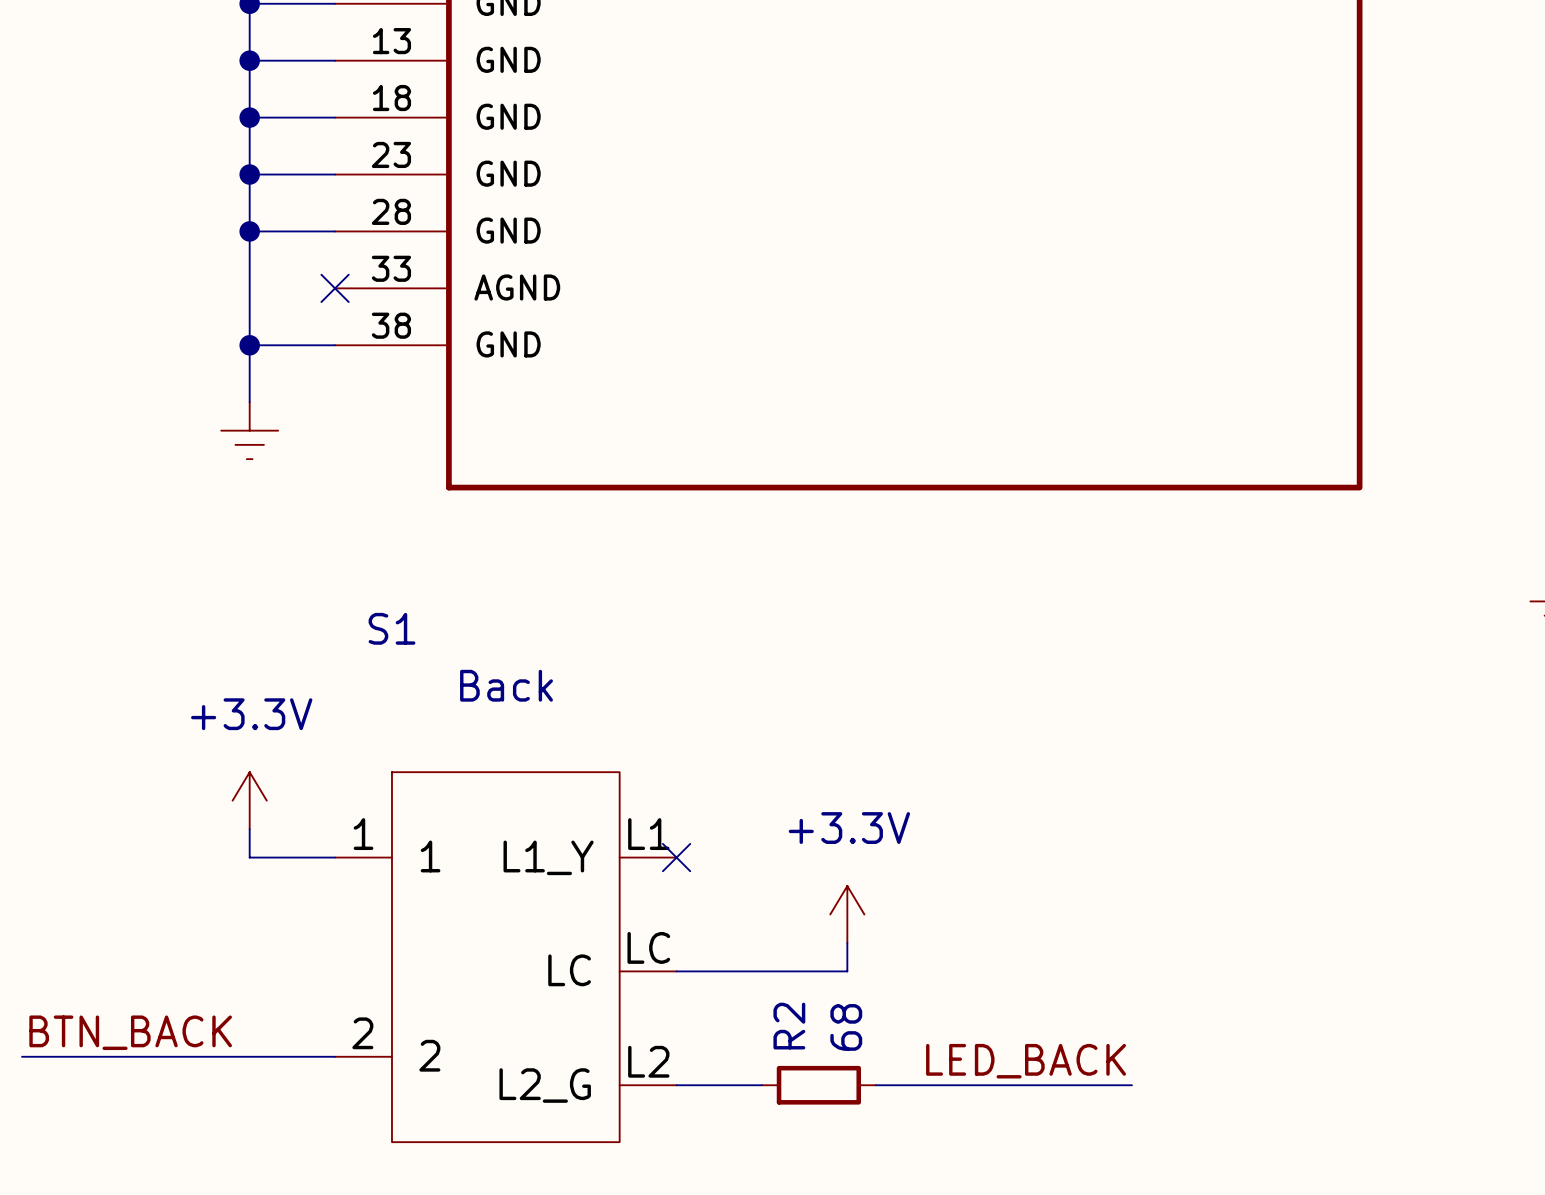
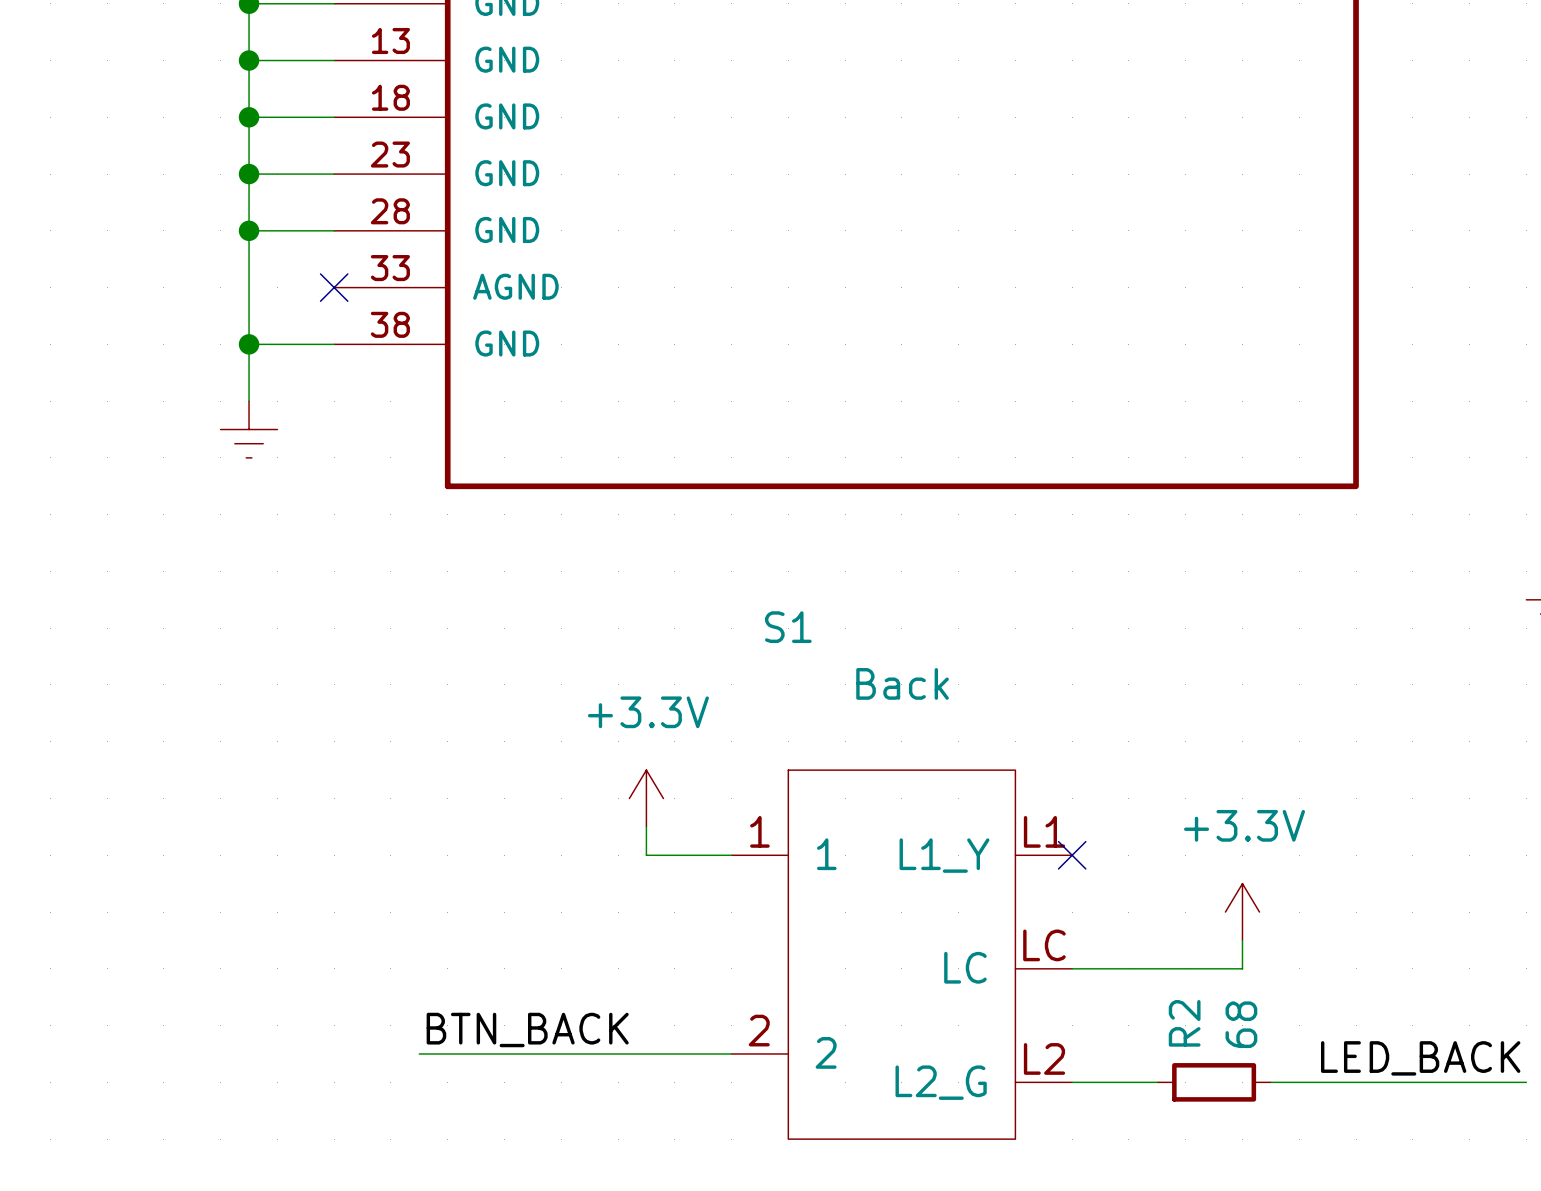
power symbol: +3.3V (249, 800) -> none
power symbol: none -> +3.3V (646, 798)
wire: (249, 829) (249, 857) (335, 857) -> (646, 826) (646, 855) (731, 855)
no-connect mark: (676, 857) -> none
no-connect mark: none -> (1072, 855)
power symbol: +3.3V (847, 914) -> none
power symbol: none -> +3.3V (1242, 912)
S1 position: (505, 928) -> (901, 926)
wire: (847, 942) (847, 971) (676, 971) -> (1242, 940) (1242, 968) (1072, 968)
label position: BTN_BACK (130, 1032) -> BTN_BACK (527, 1030)
wire: (22, 1056) (335, 1056) -> (419, 1053) (731, 1053)
label position: LED_BACK (1026, 1061) -> LED_BACK (1420, 1058)
wire: (676, 1085) (761, 1085) -> none
R2 position: (818, 1085) -> (1214, 1082)
wire: (875, 1085) (1075, 1085) -> none
wire: none -> (1128, 1082) (1157, 1082)
wire: none -> (1270, 1082) (1526, 1082)

